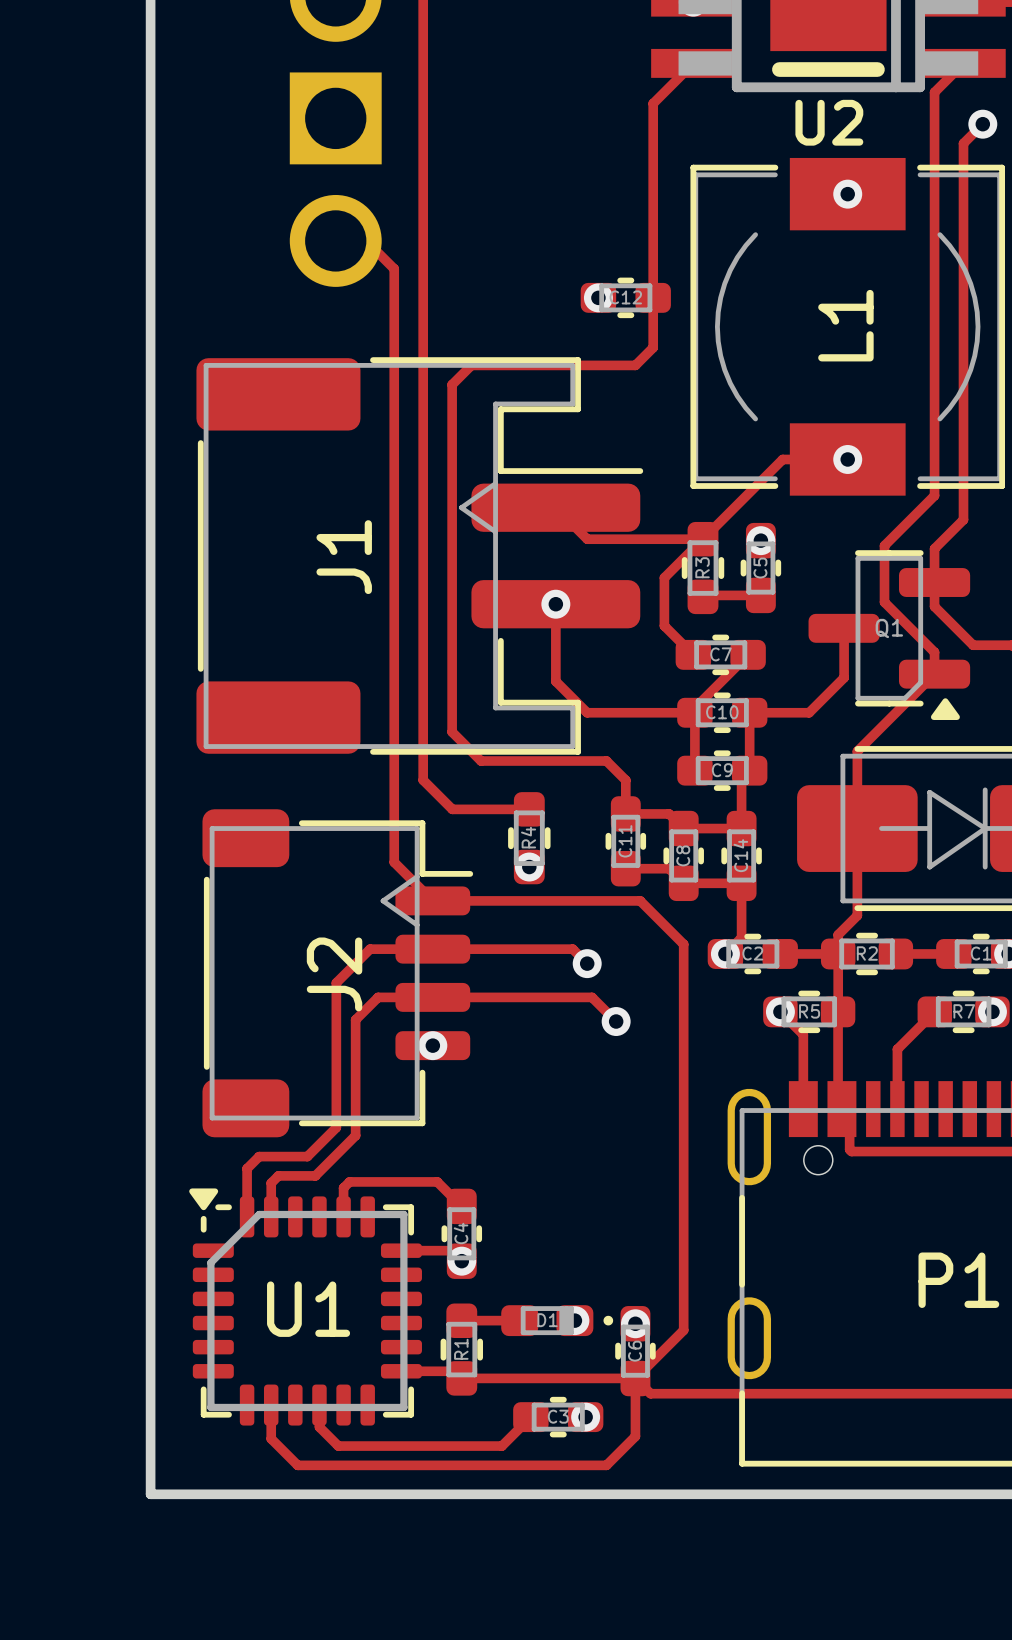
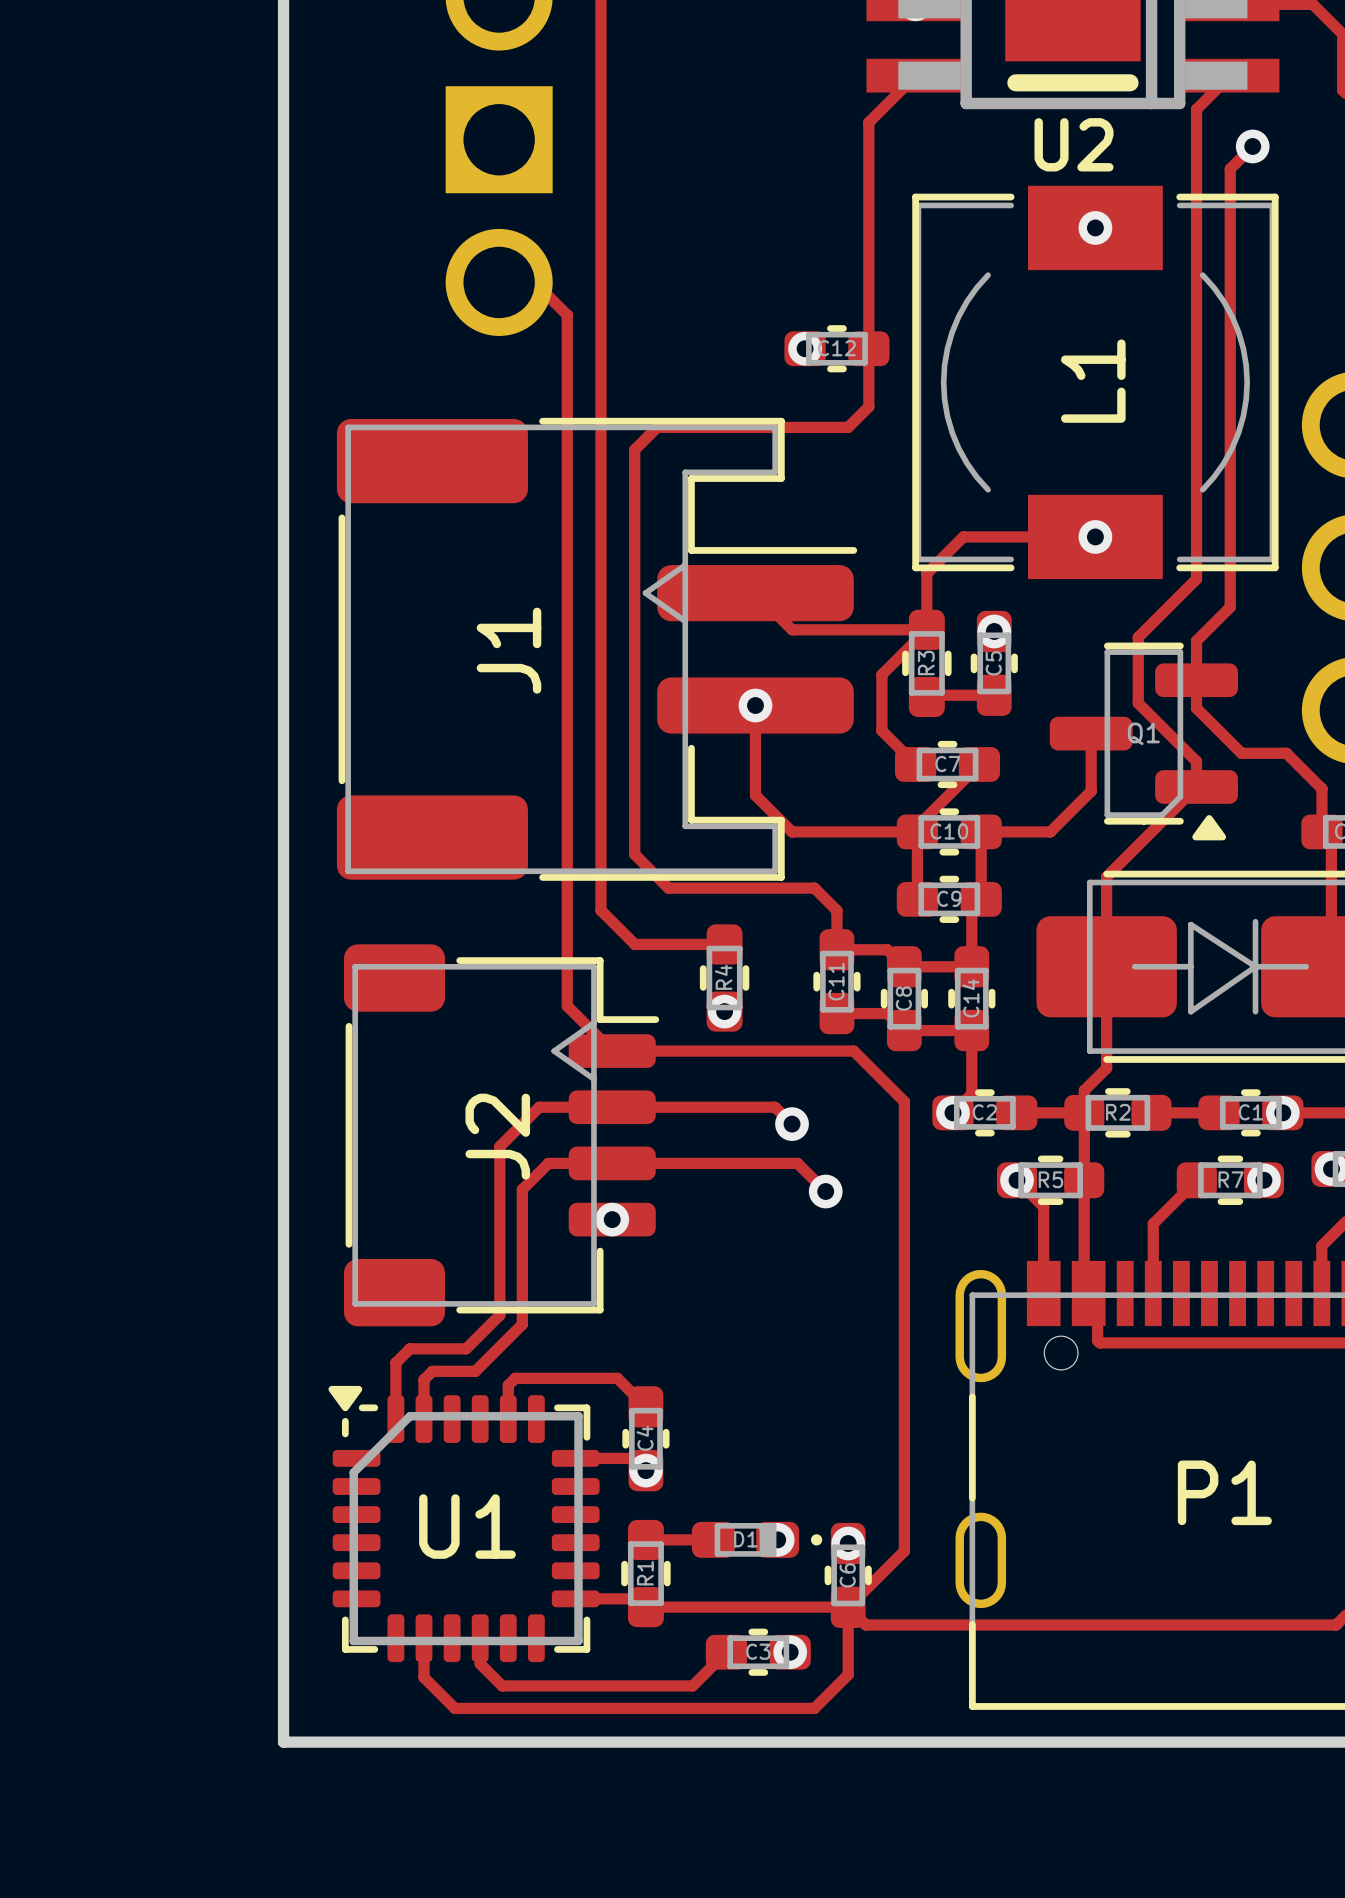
track: (782, 459) (702, 539) -> (1019, 536) (963, 536) (926, 573) (926, 629)

